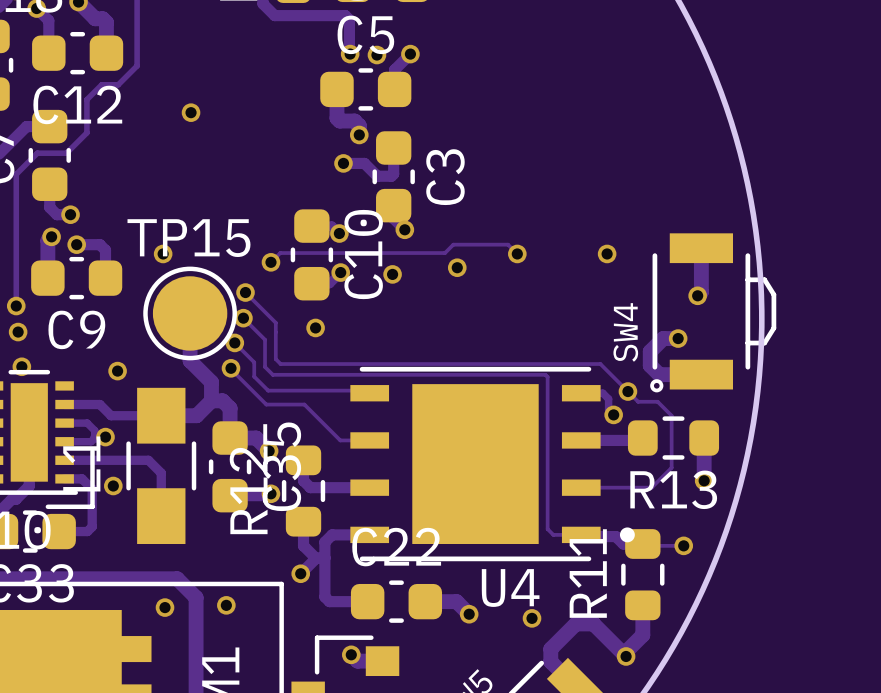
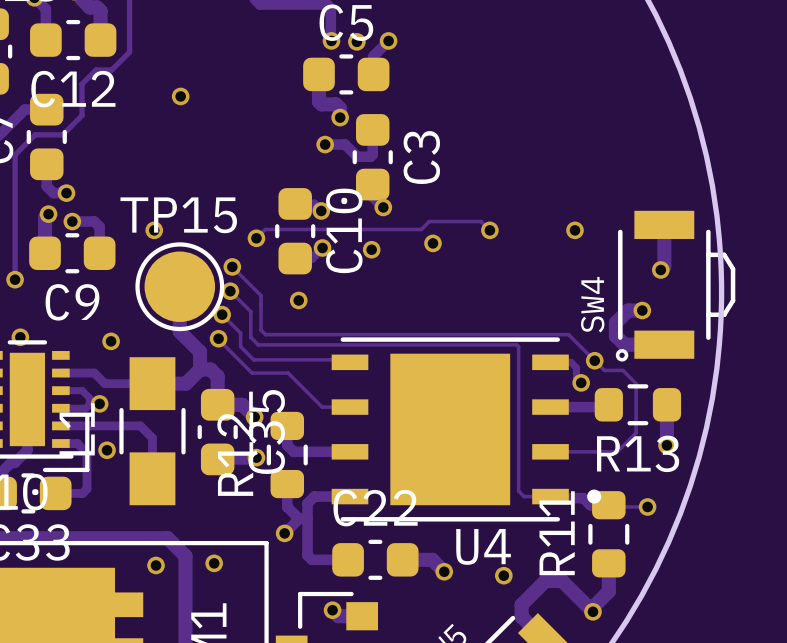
via: (18, 332) -> none

